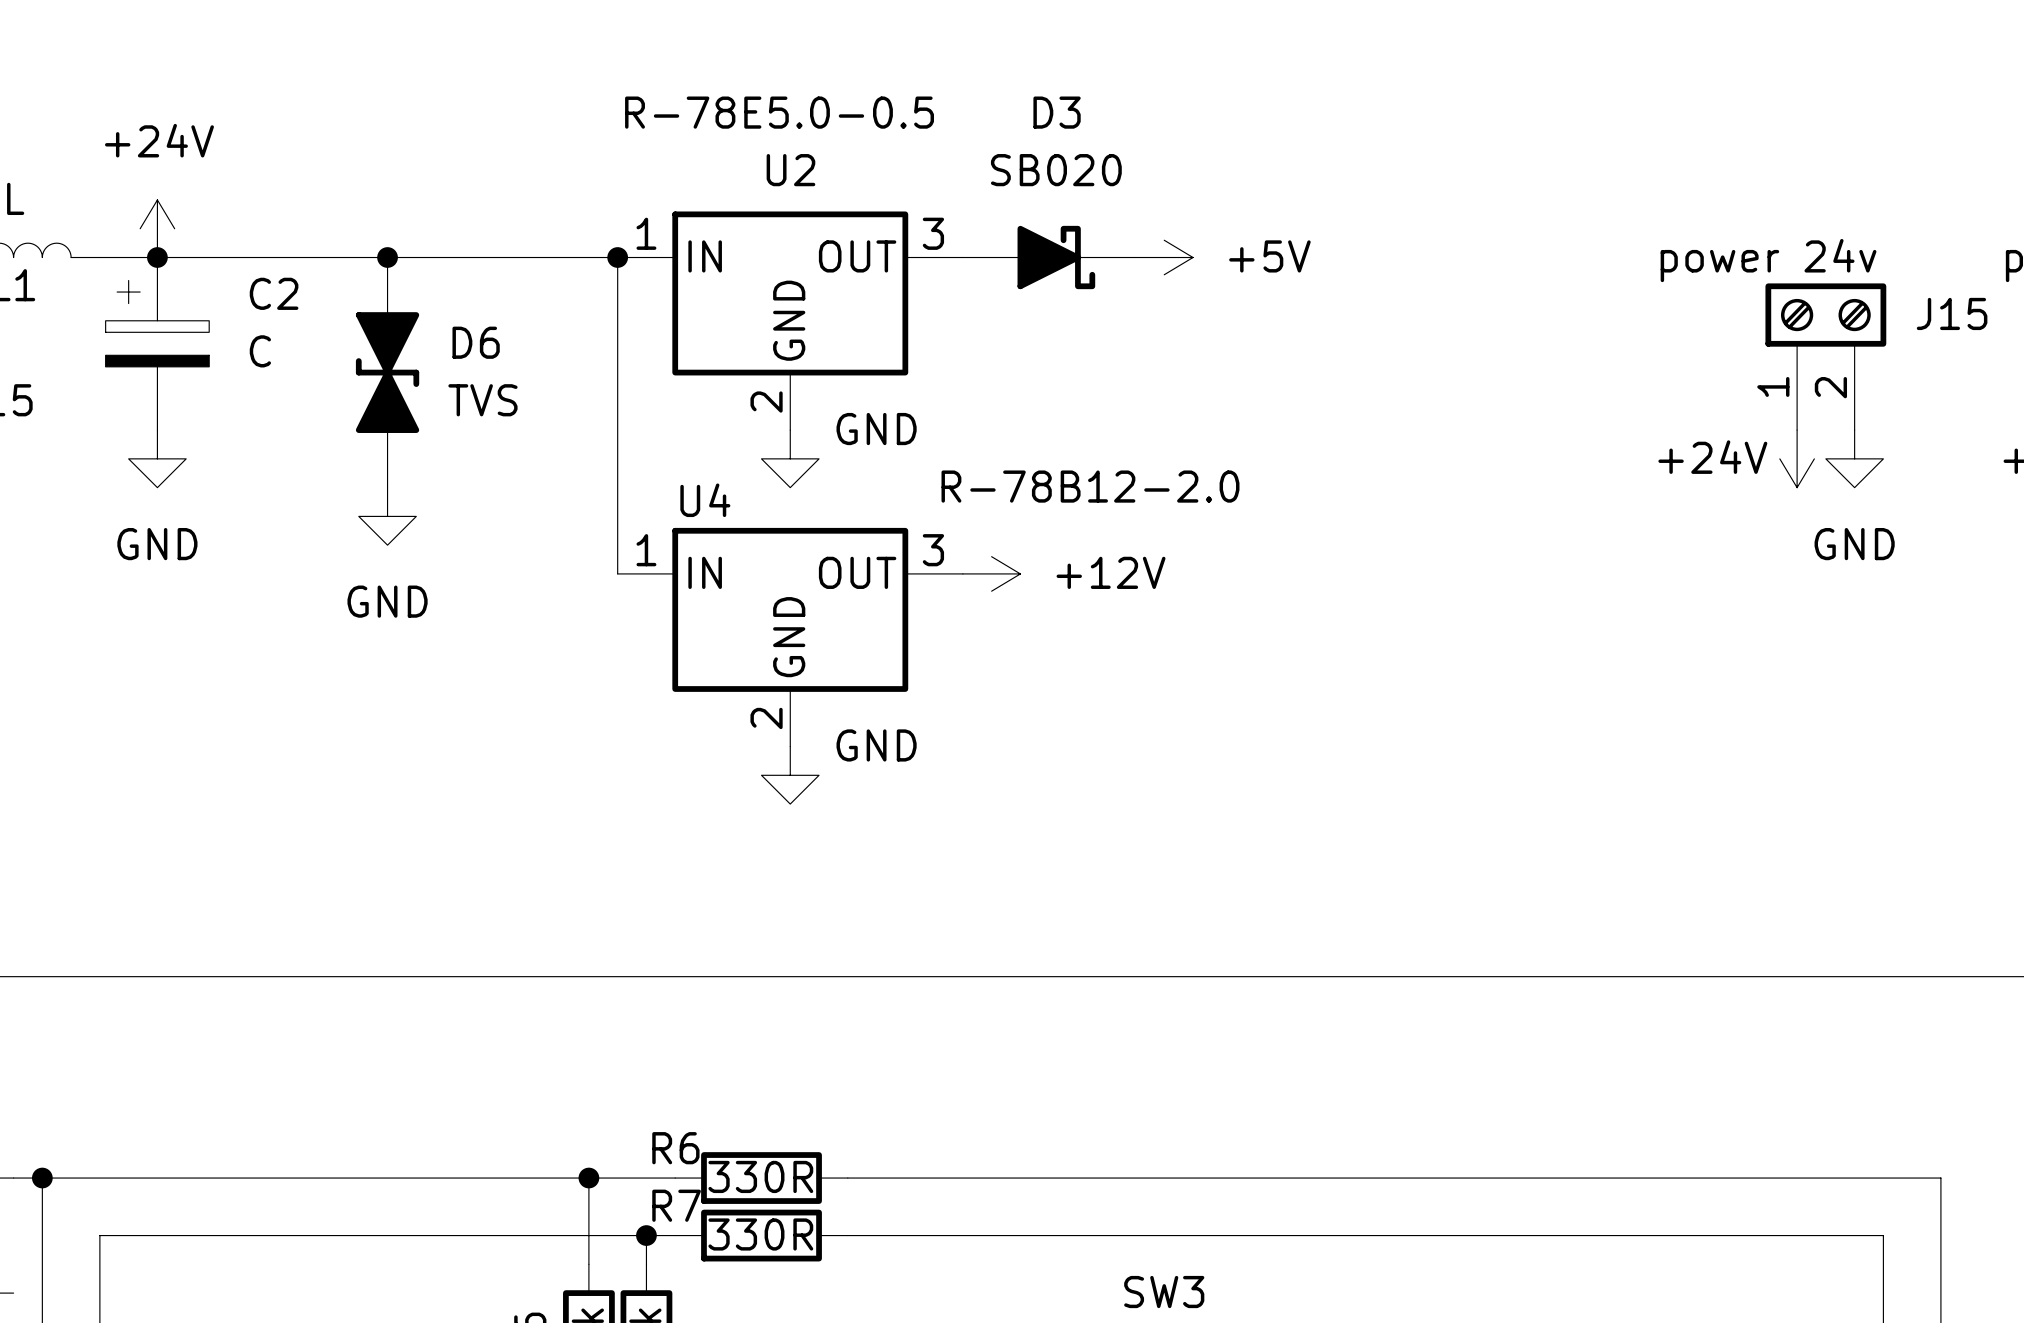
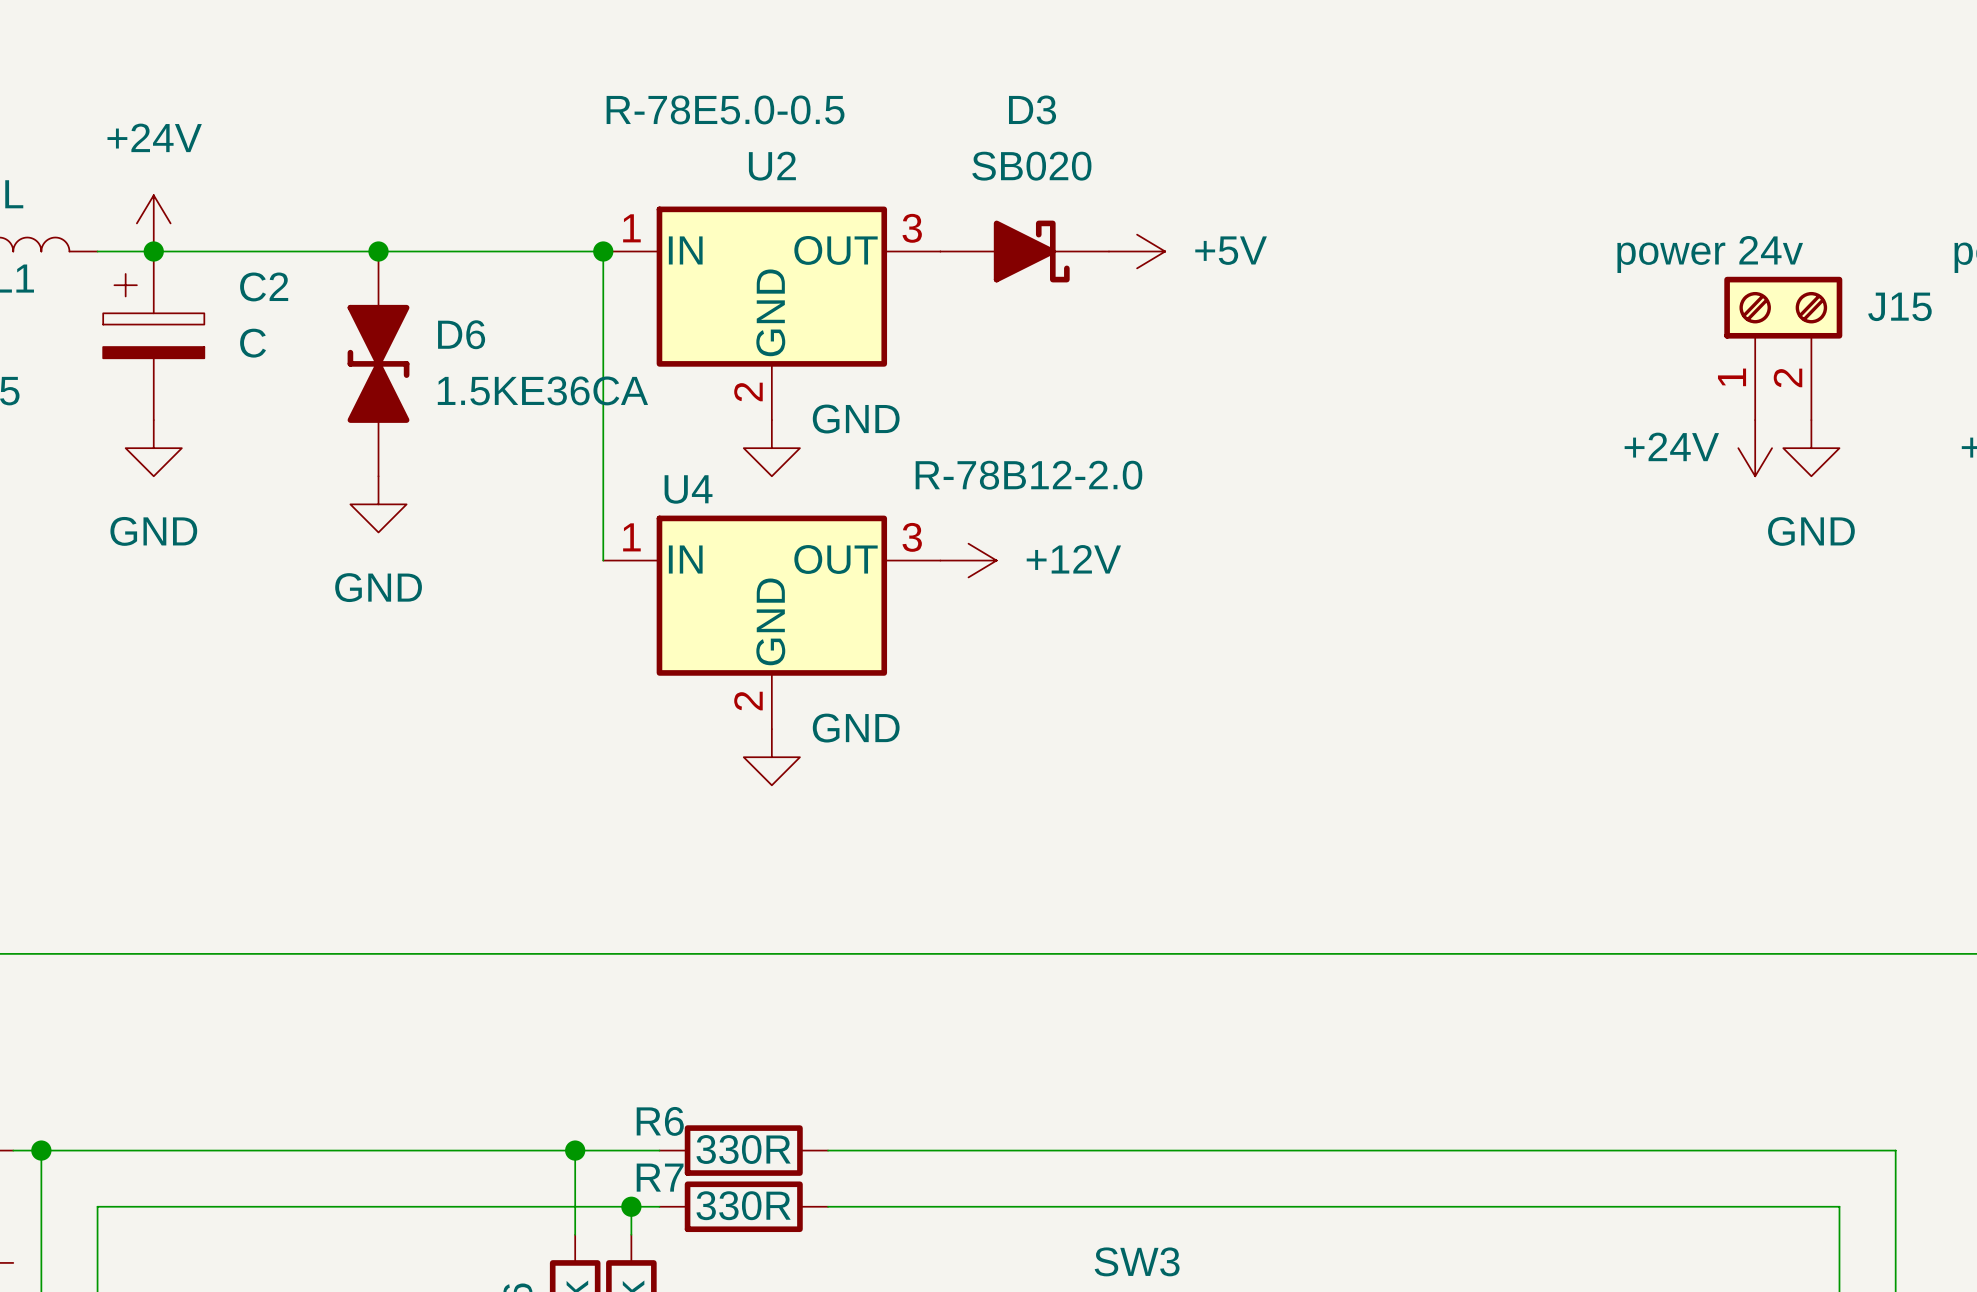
D6 value: TVS (482, 400) -> 1.5KE36CA (542, 390)

